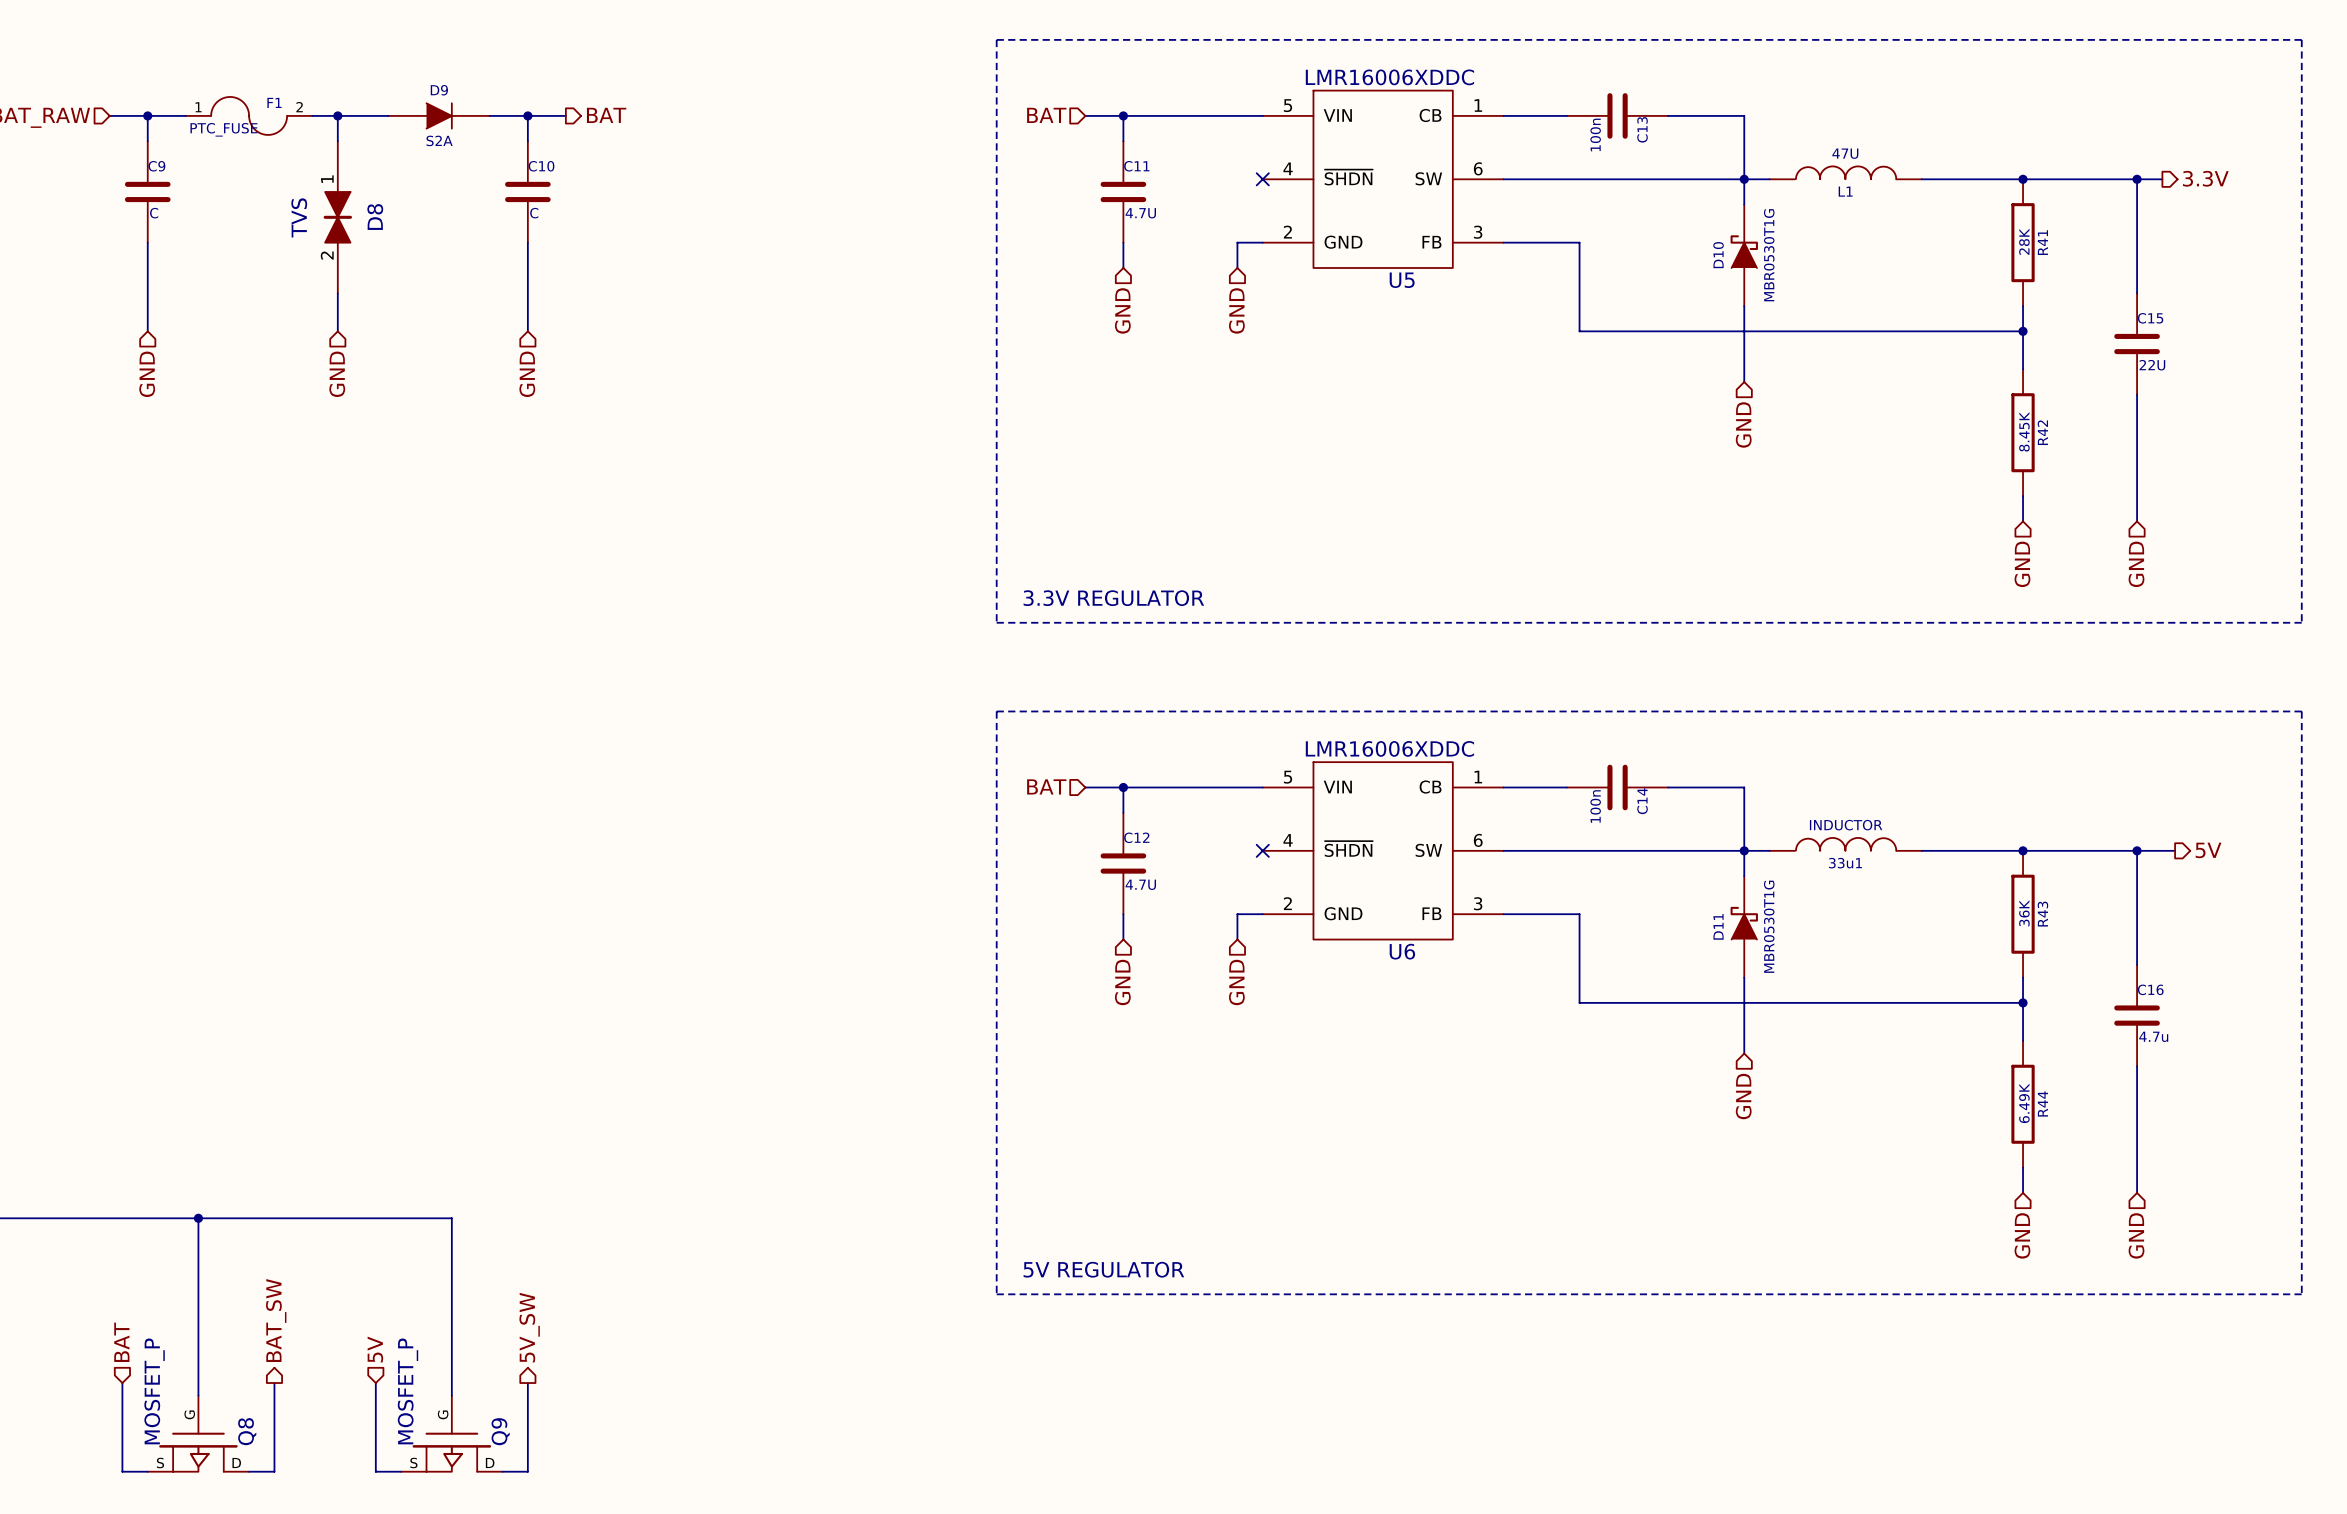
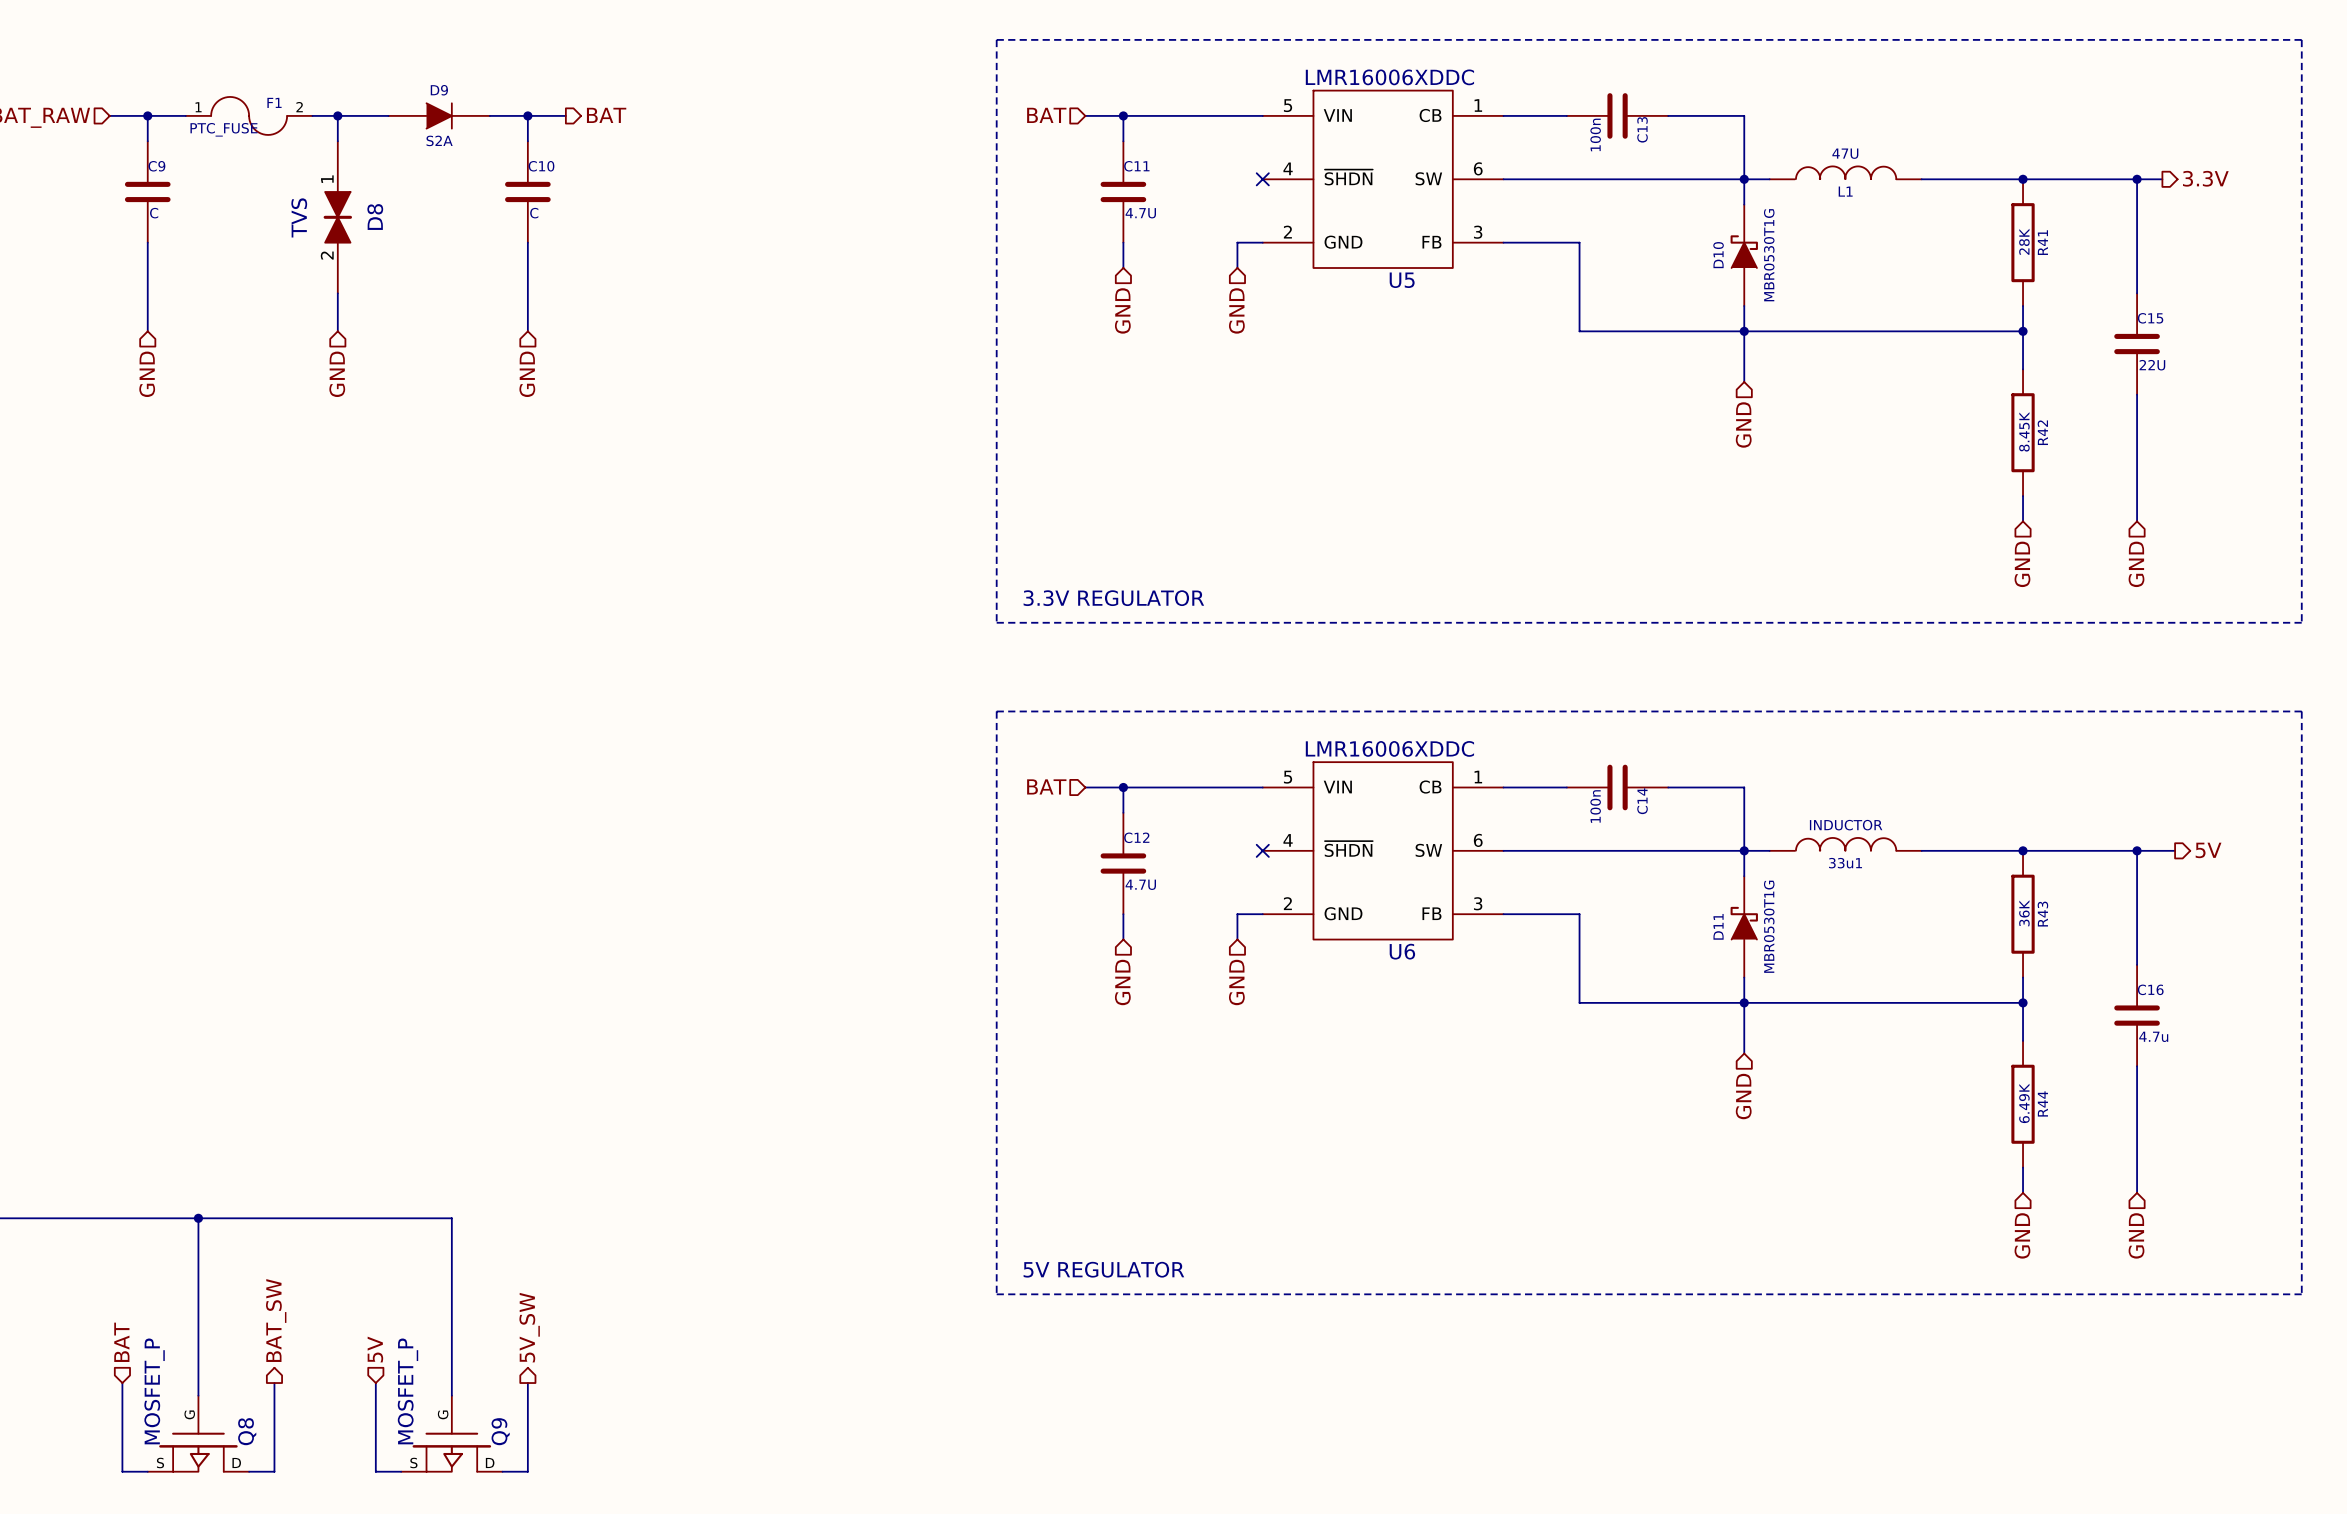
junction: none -> (1744, 331)
junction: none -> (1744, 1002)

